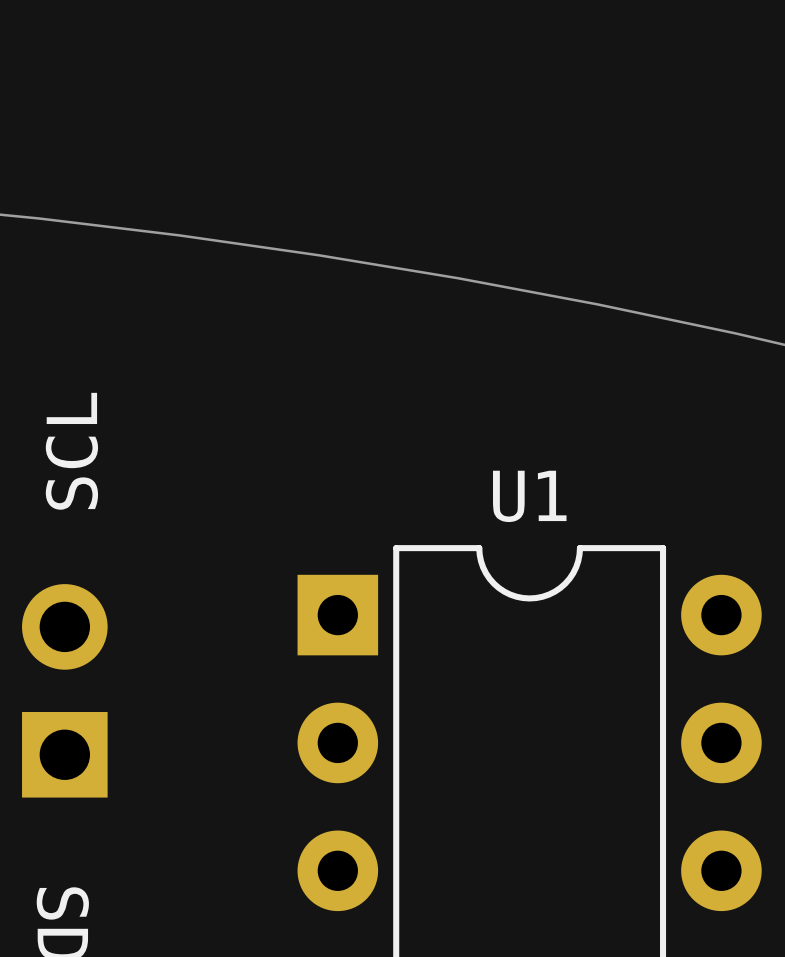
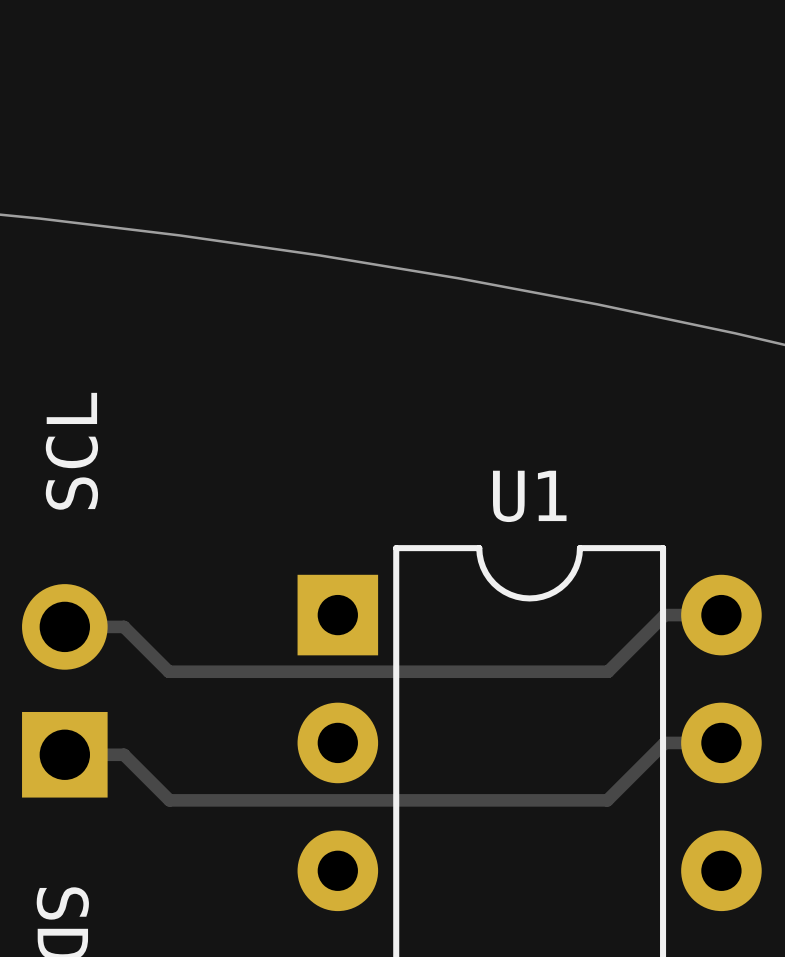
track: none -> (721, 615) (664, 615) (608, 671) (168, 671) (123, 626) (64, 626)
track: none -> (721, 742) (664, 742) (607, 800) (169, 800) (123, 754) (64, 754)

